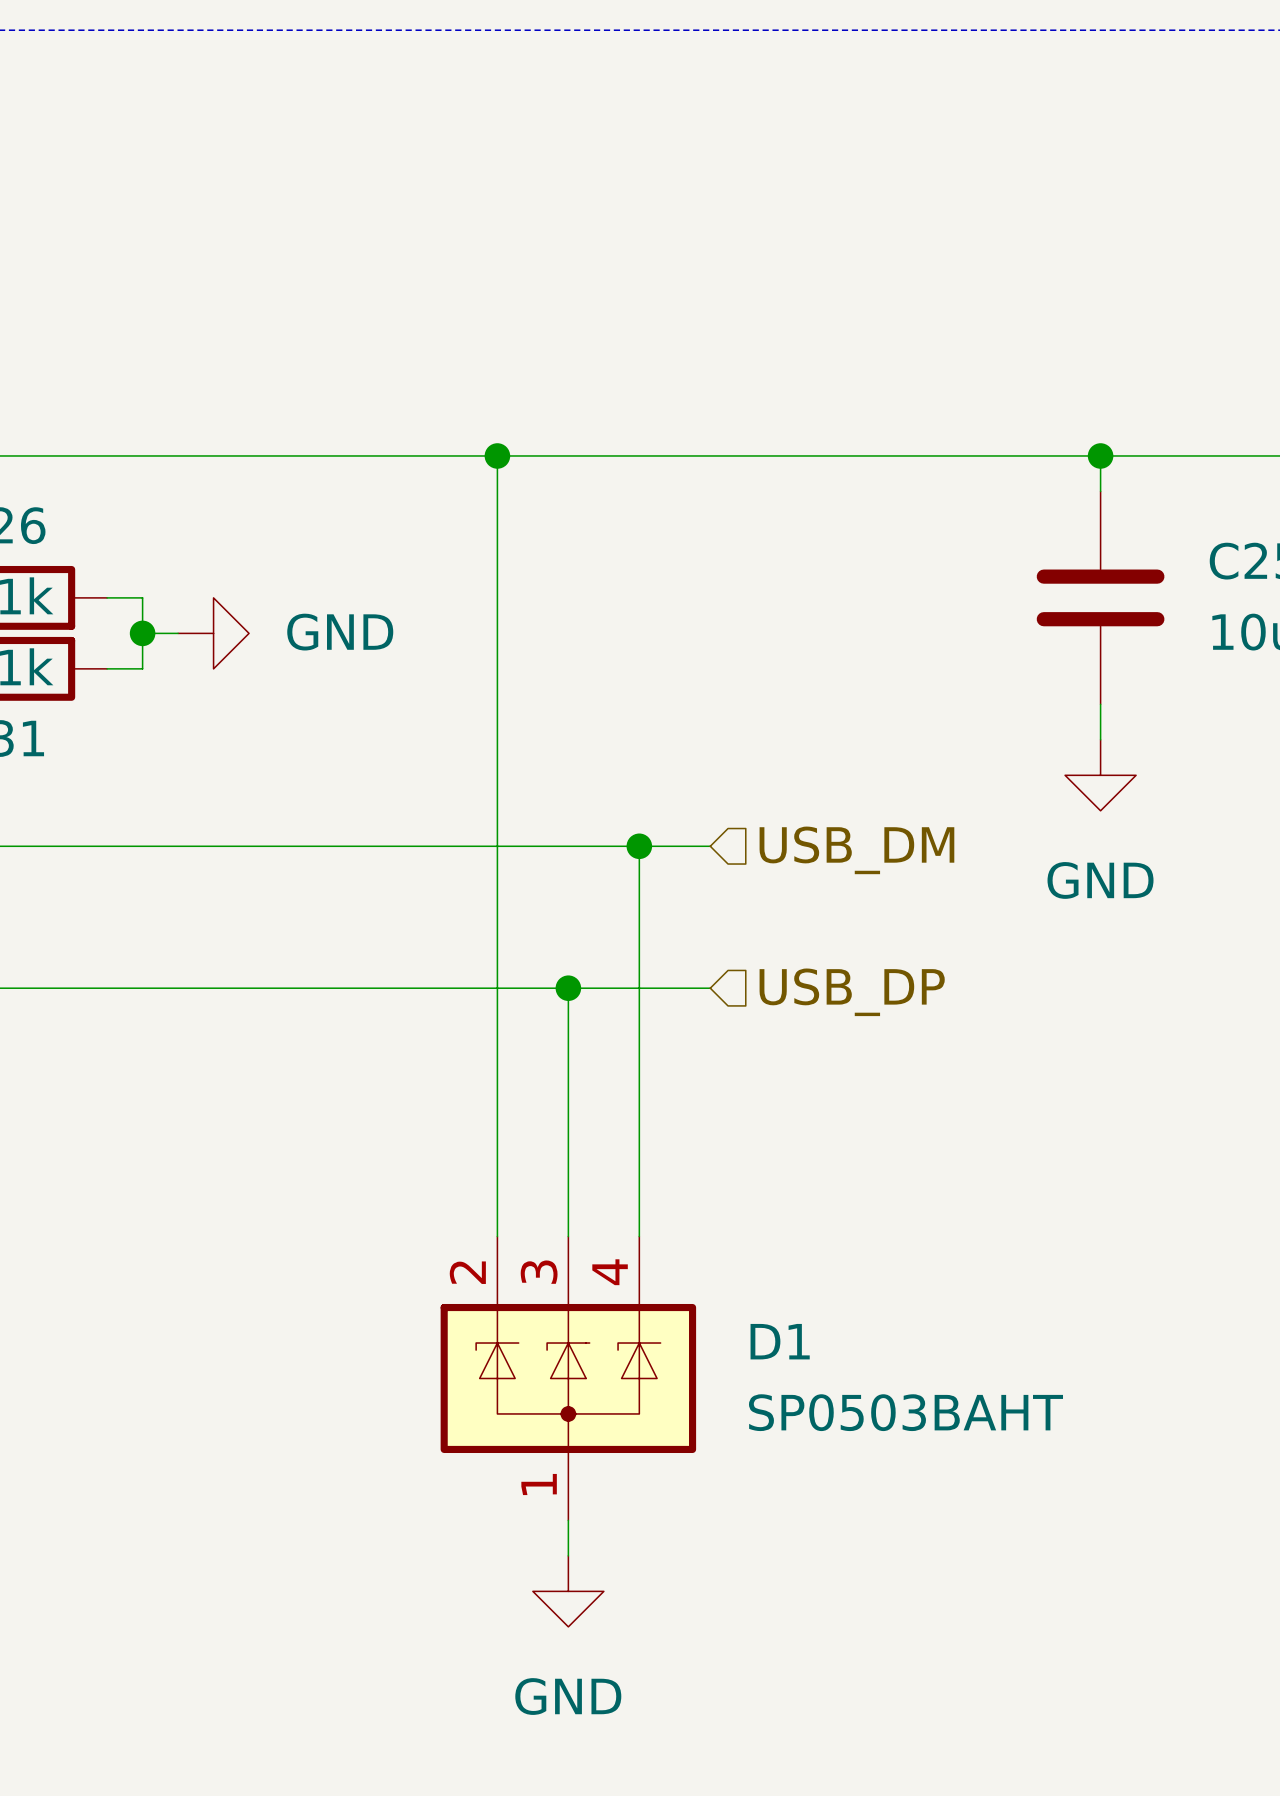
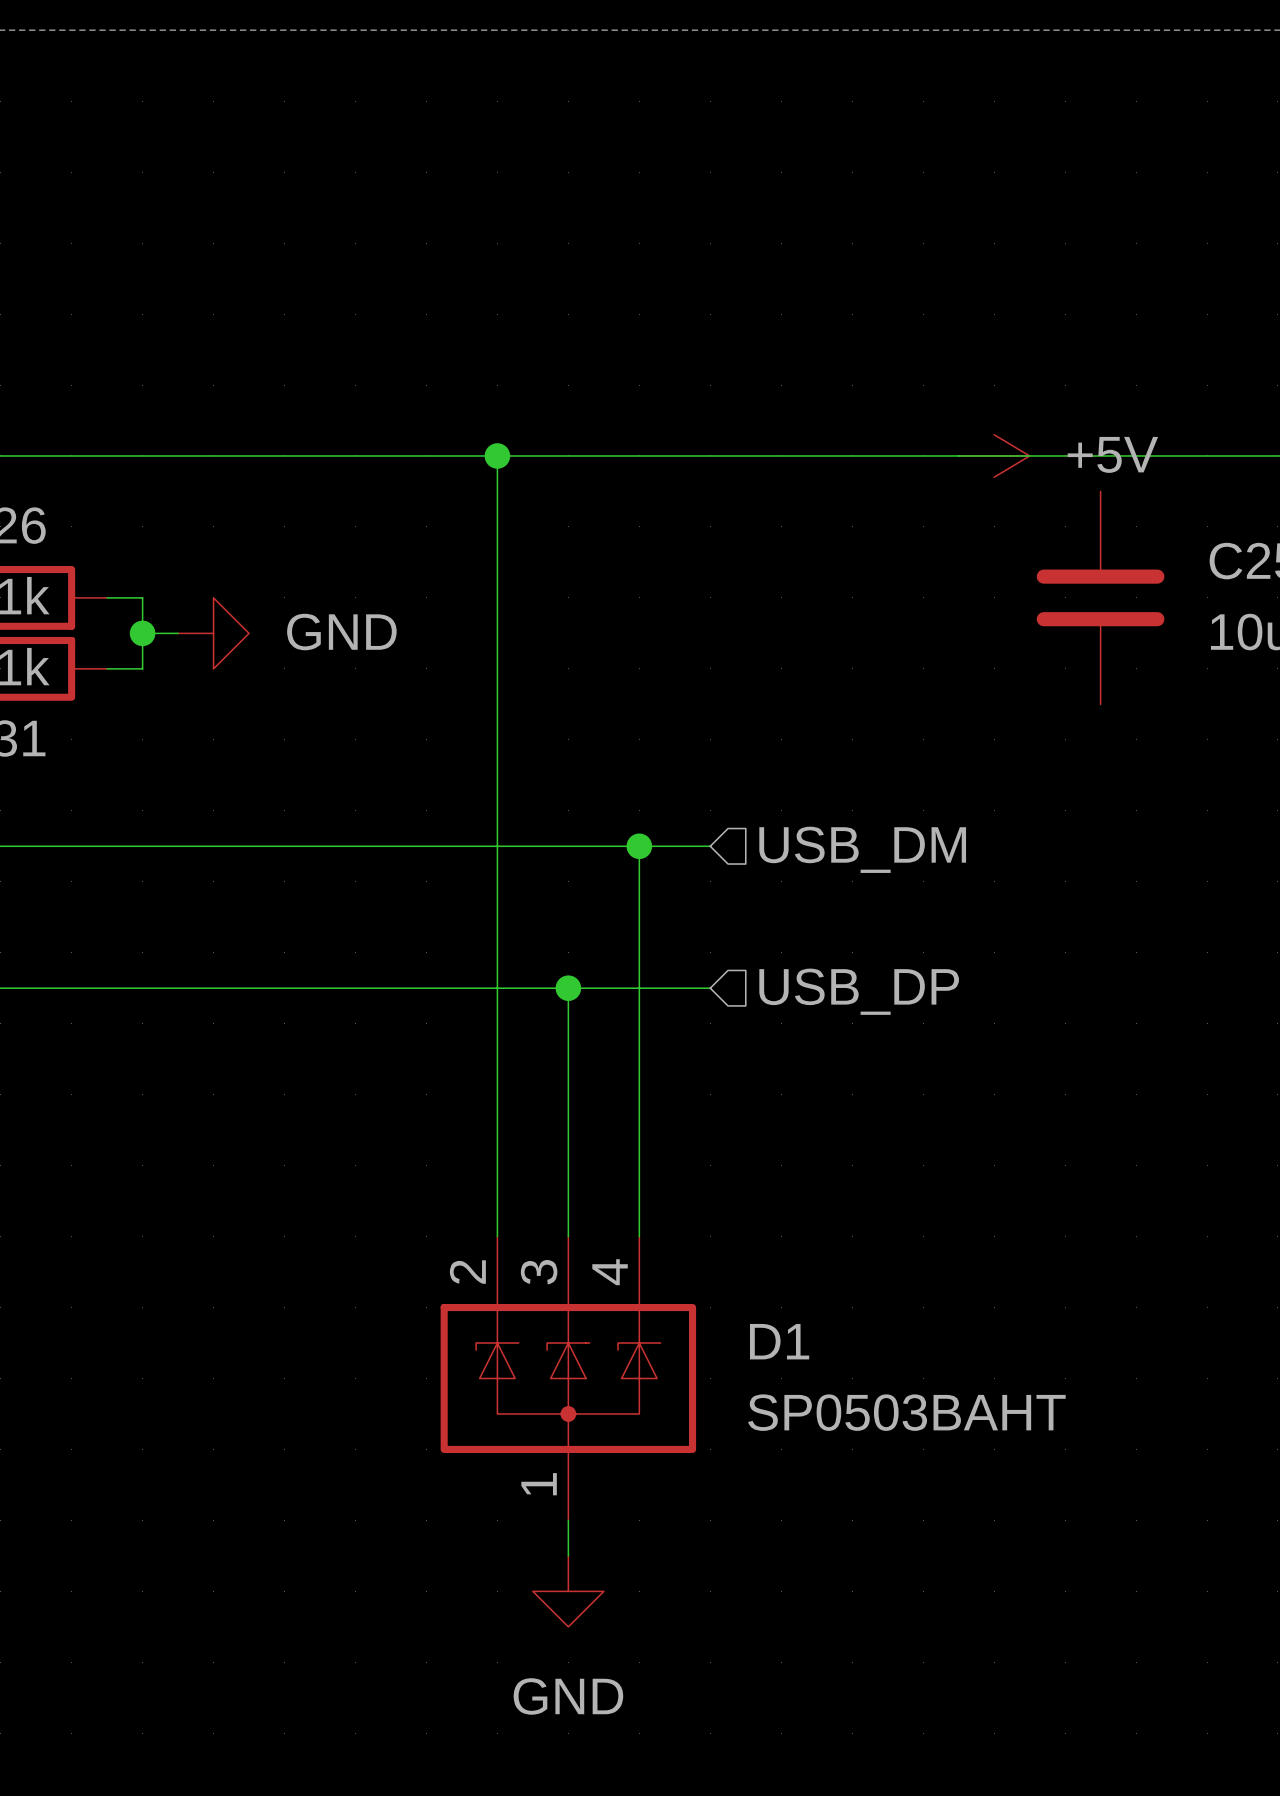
power symbol: none -> +5V (994, 455)
wire: (1100, 455) (1100, 491) -> none
junction: (1100, 455) -> none
wire: (1100, 704) (1100, 739) -> none
power symbol: GND (1100, 775) -> none

